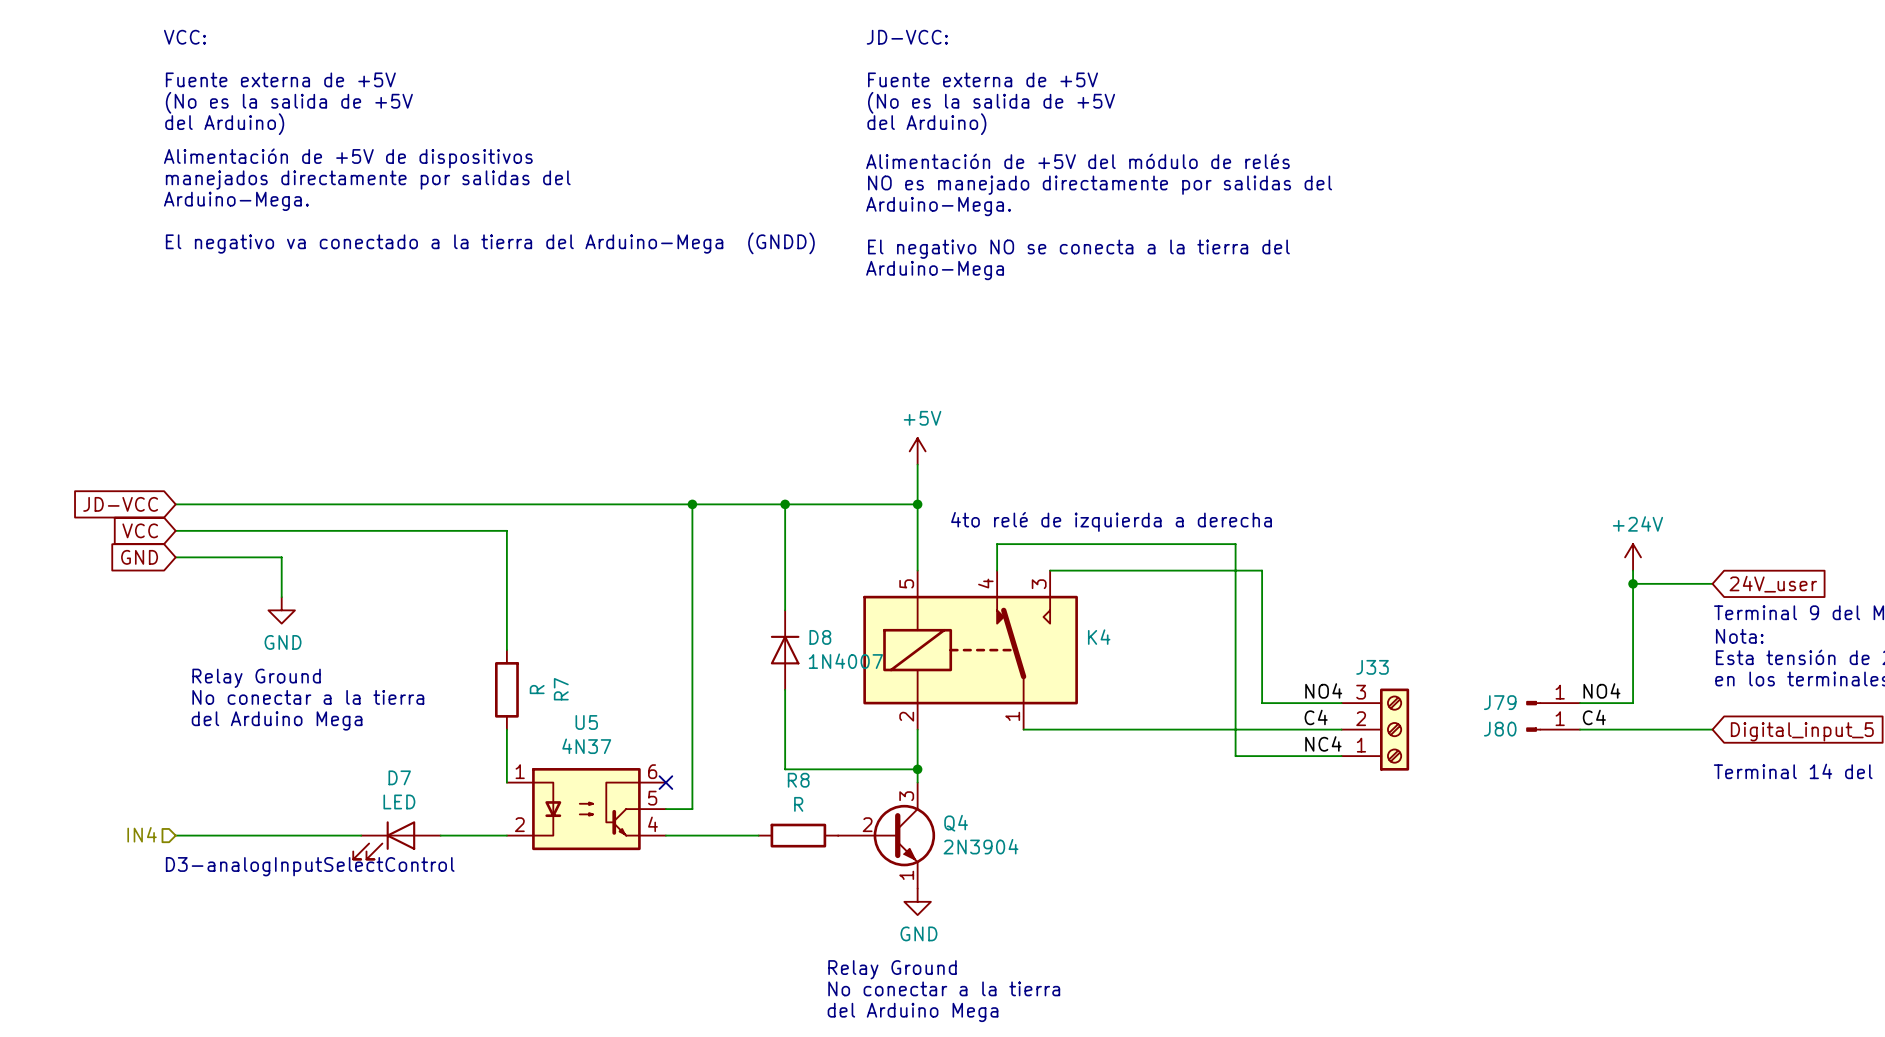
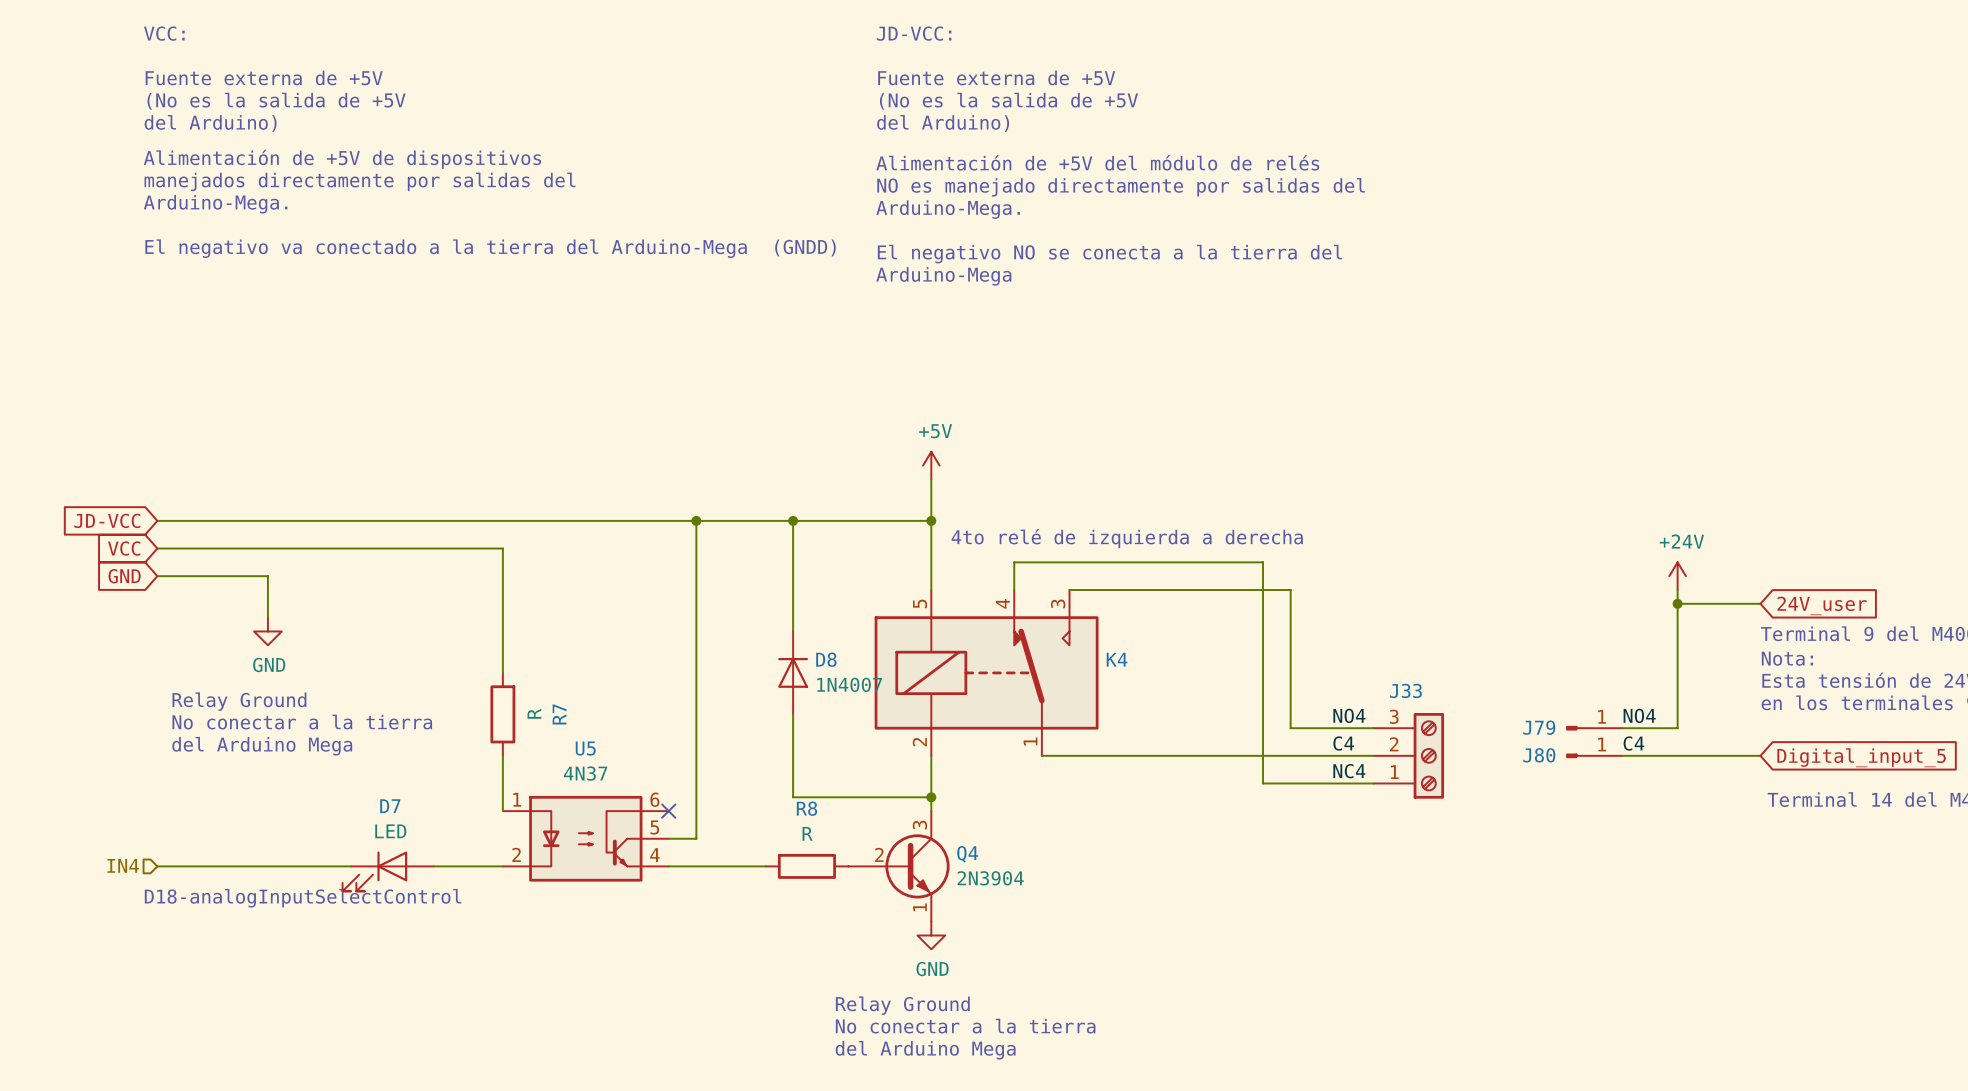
text: D3-analogInputSelectControl (310, 866) -> D18-analogInputSelectControl (303, 898)

